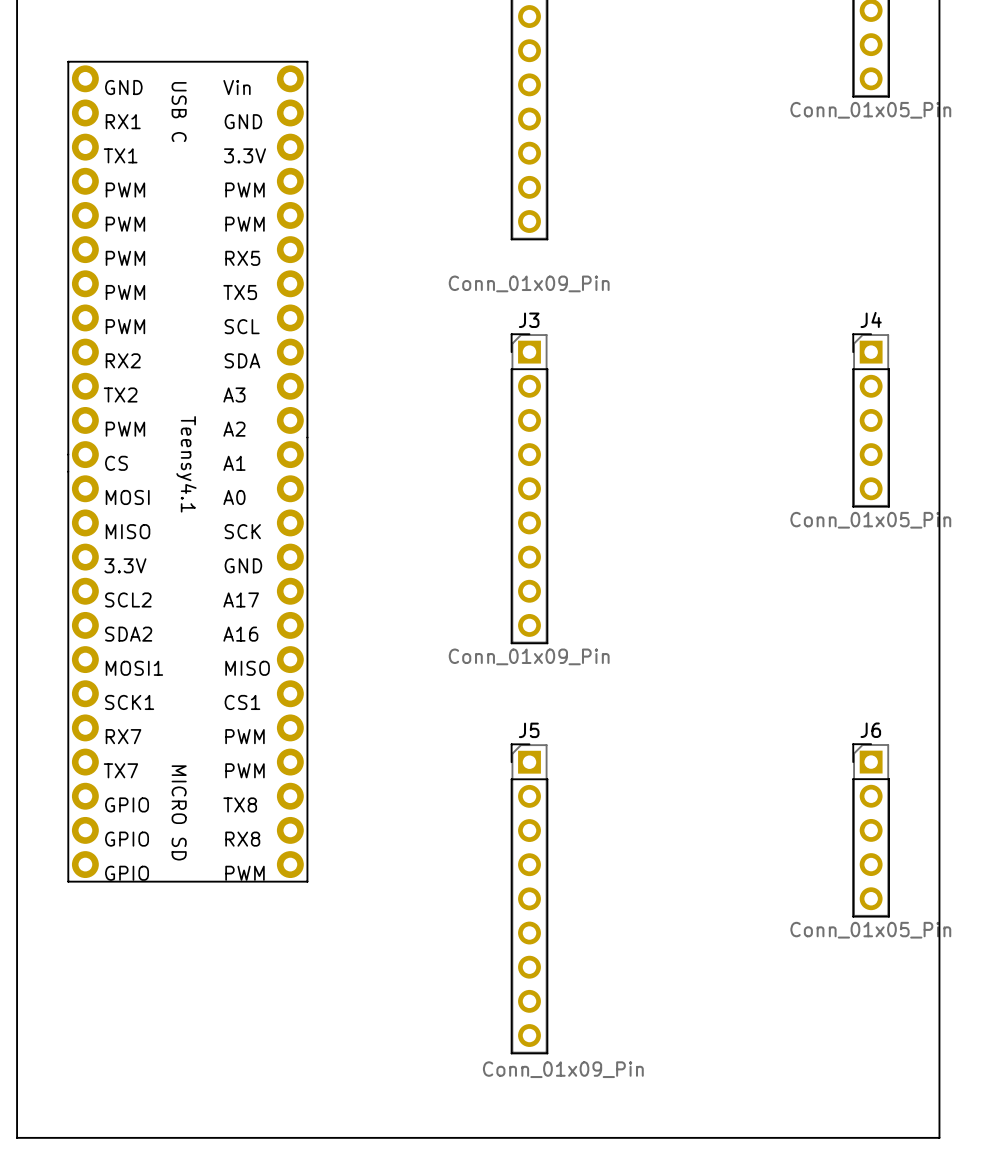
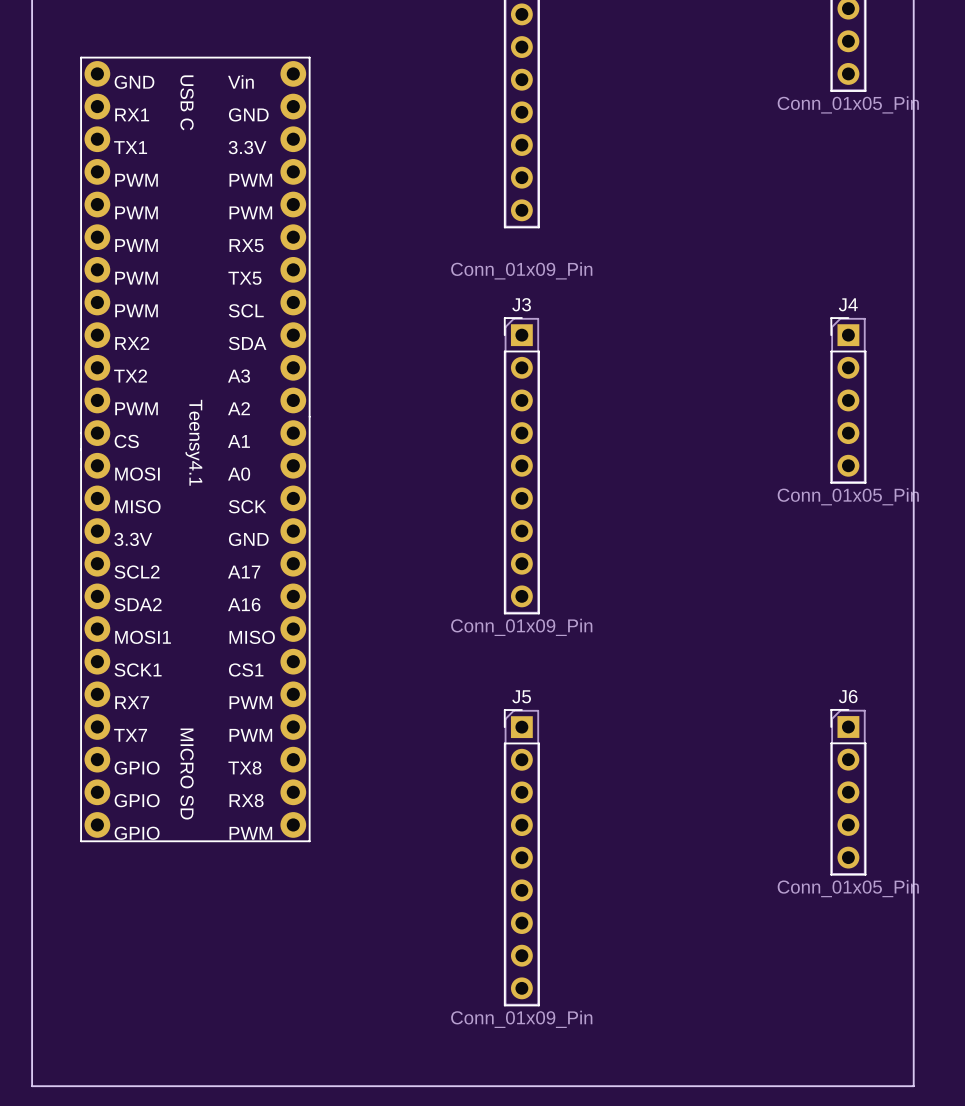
J5 value position: Conn_01x09_Pin (563, 1069) -> Conn_01x09_Pin (521, 1019)

